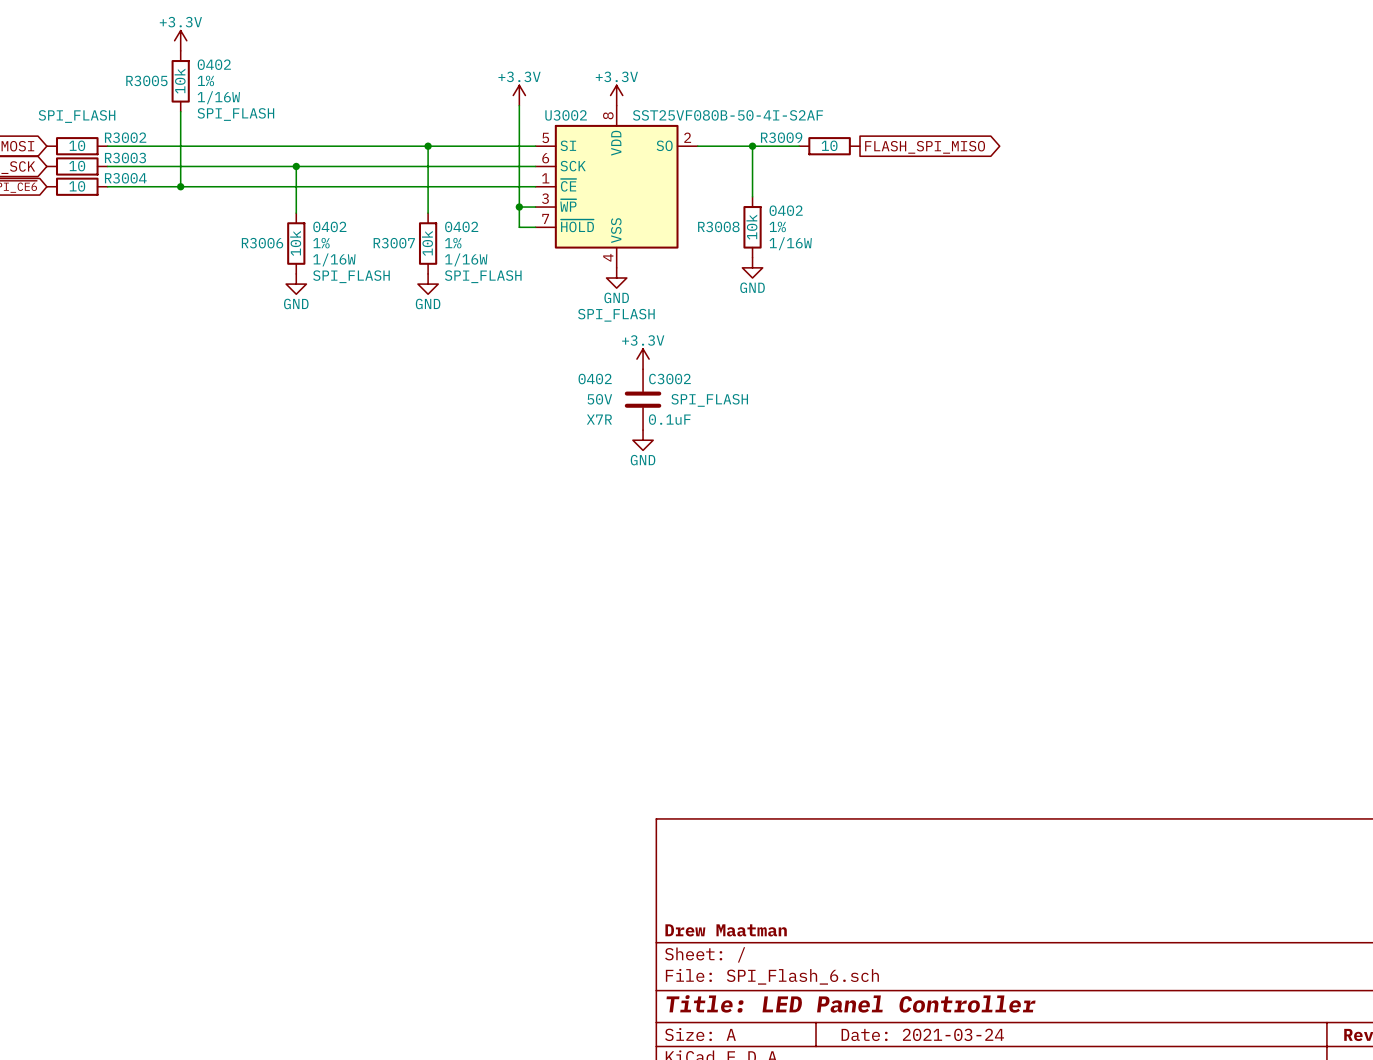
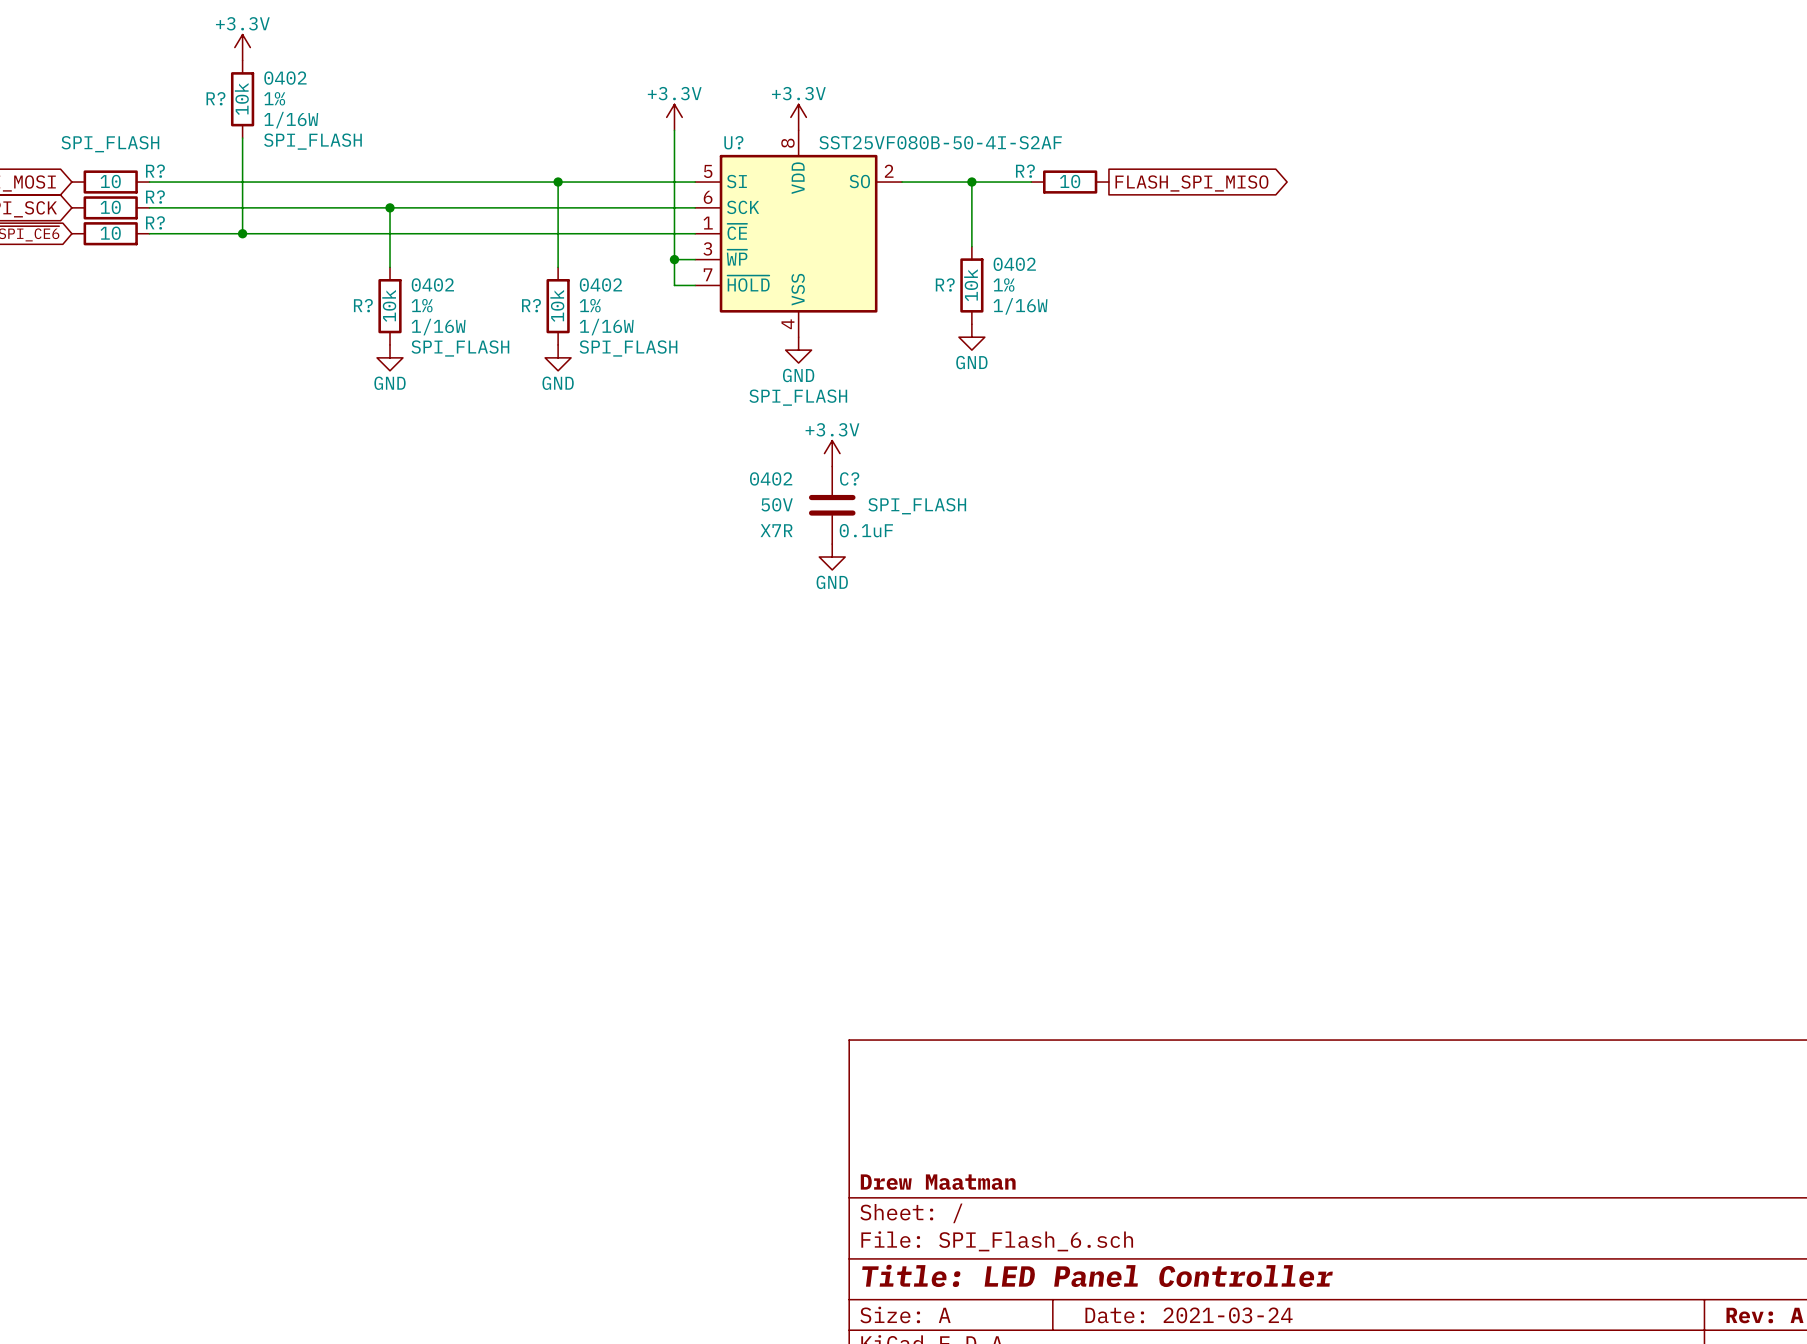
R3005 name: R3005 (146, 80) -> R? (215, 98)
U3002 name: U3002 (566, 115) -> U? (733, 142)
R3002 name: R3002 (125, 137) -> R? (155, 171)
R3009 name: R3009 (781, 137) -> R? (1025, 171)
R3003 name: R3003 (125, 157) -> R? (155, 197)
R3004 name: R3004 (125, 178) -> R? (155, 222)
R3008 name: R3008 (718, 226) -> R? (945, 284)
R3006 name: R3006 (262, 243) -> R? (363, 305)
R3007 name: R3007 (394, 243) -> R? (531, 305)
C3002 name: C3002 (669, 379) -> C? (849, 478)

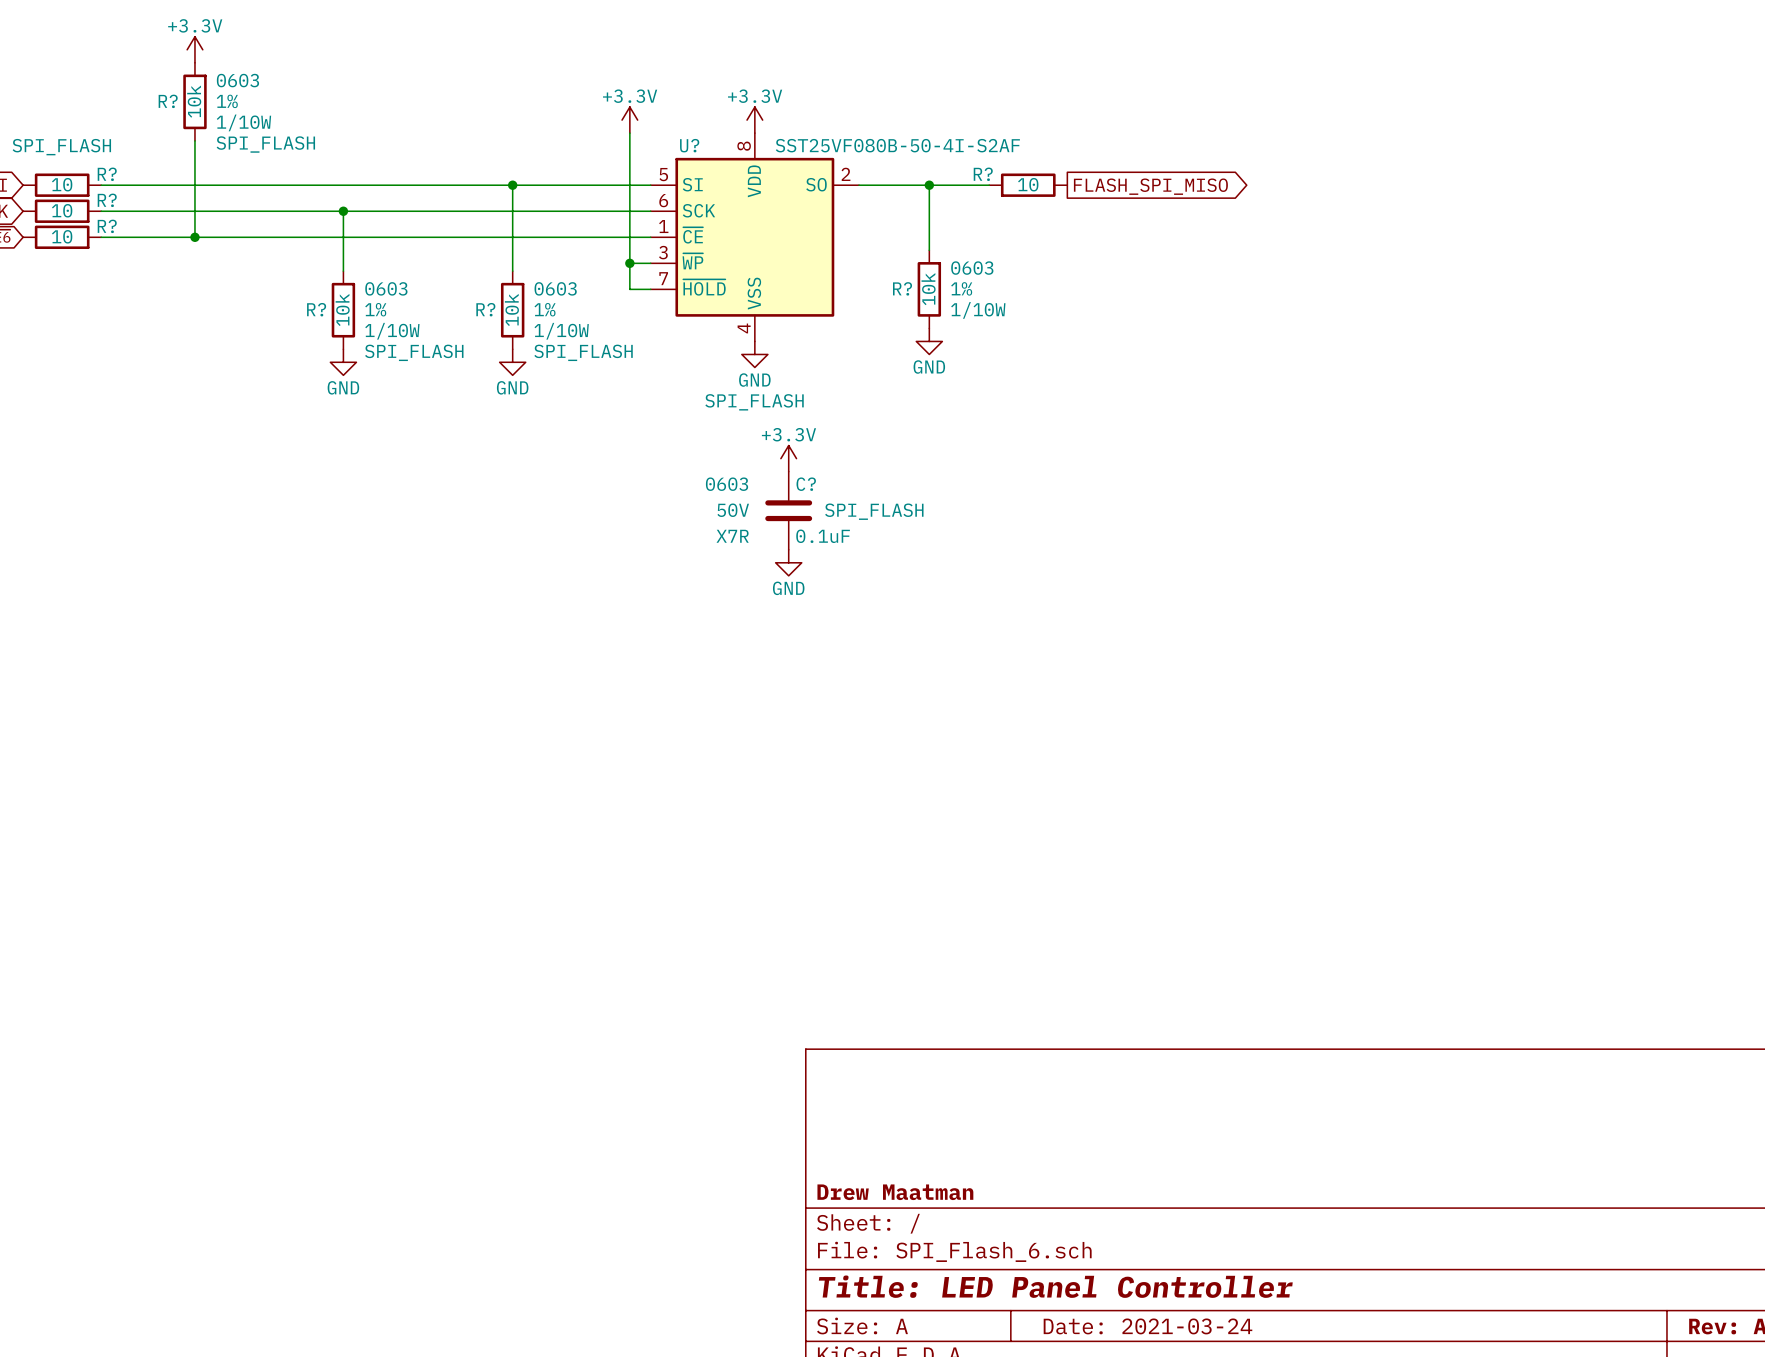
R? text: 0402 (285, 78) -> 0603 (237, 80)
R? text: 1/16W (291, 120) -> 1/10W (243, 122)
R? text: 0402 (1014, 264) -> 0603 (972, 268)
R? text: 0402 (432, 284) -> 0603 (386, 288)
R? text: 0402 (600, 284) -> 0603 (555, 288)
R? text: 1/16W (1020, 306) -> 1/10W (978, 310)
R? text: 1/16W (438, 327) -> 1/10W (392, 331)
R? text: 1/16W (606, 327) -> 1/10W (561, 331)
C? text: 0402 (771, 478) -> 0603 (727, 484)

